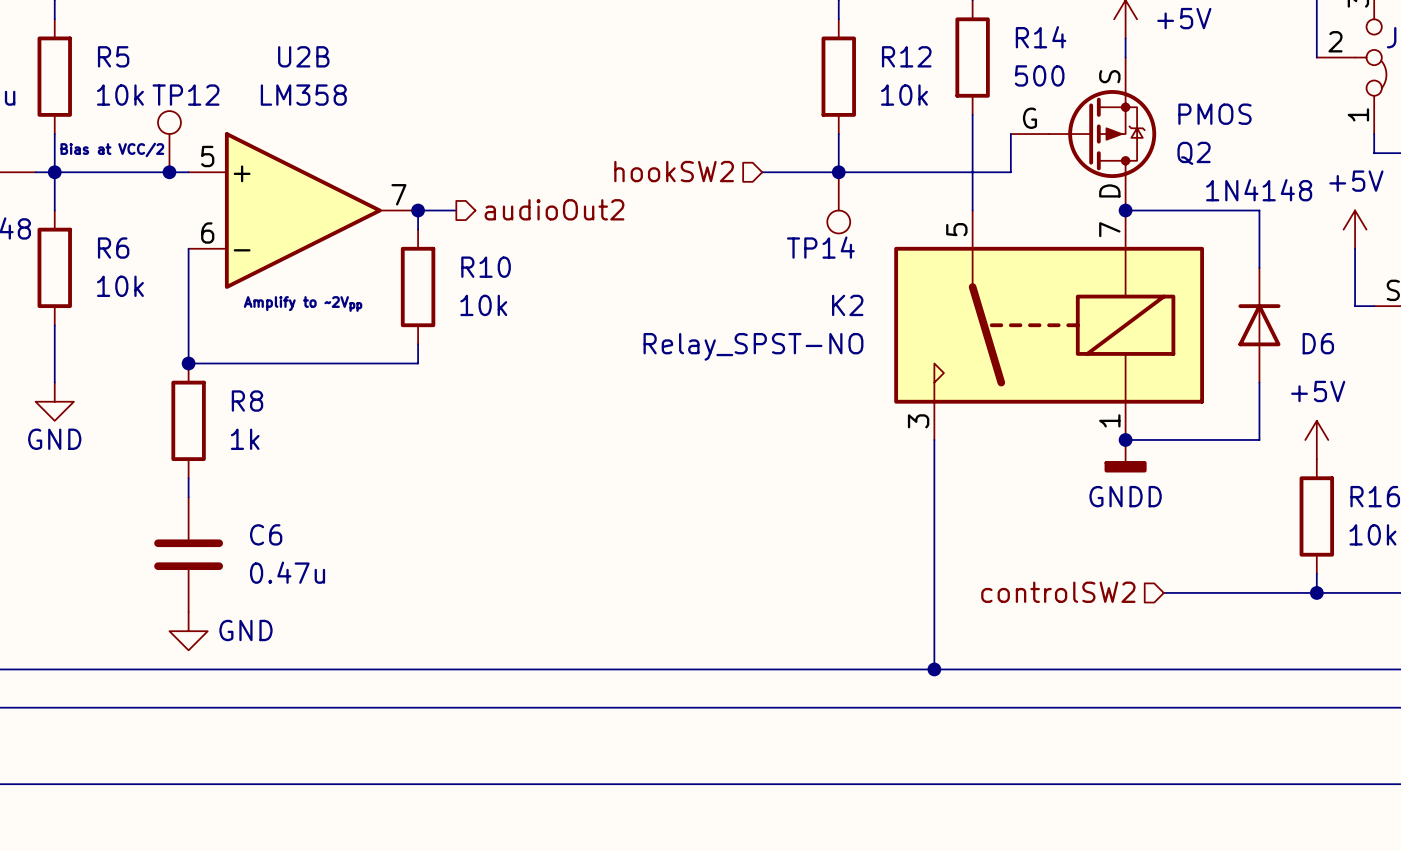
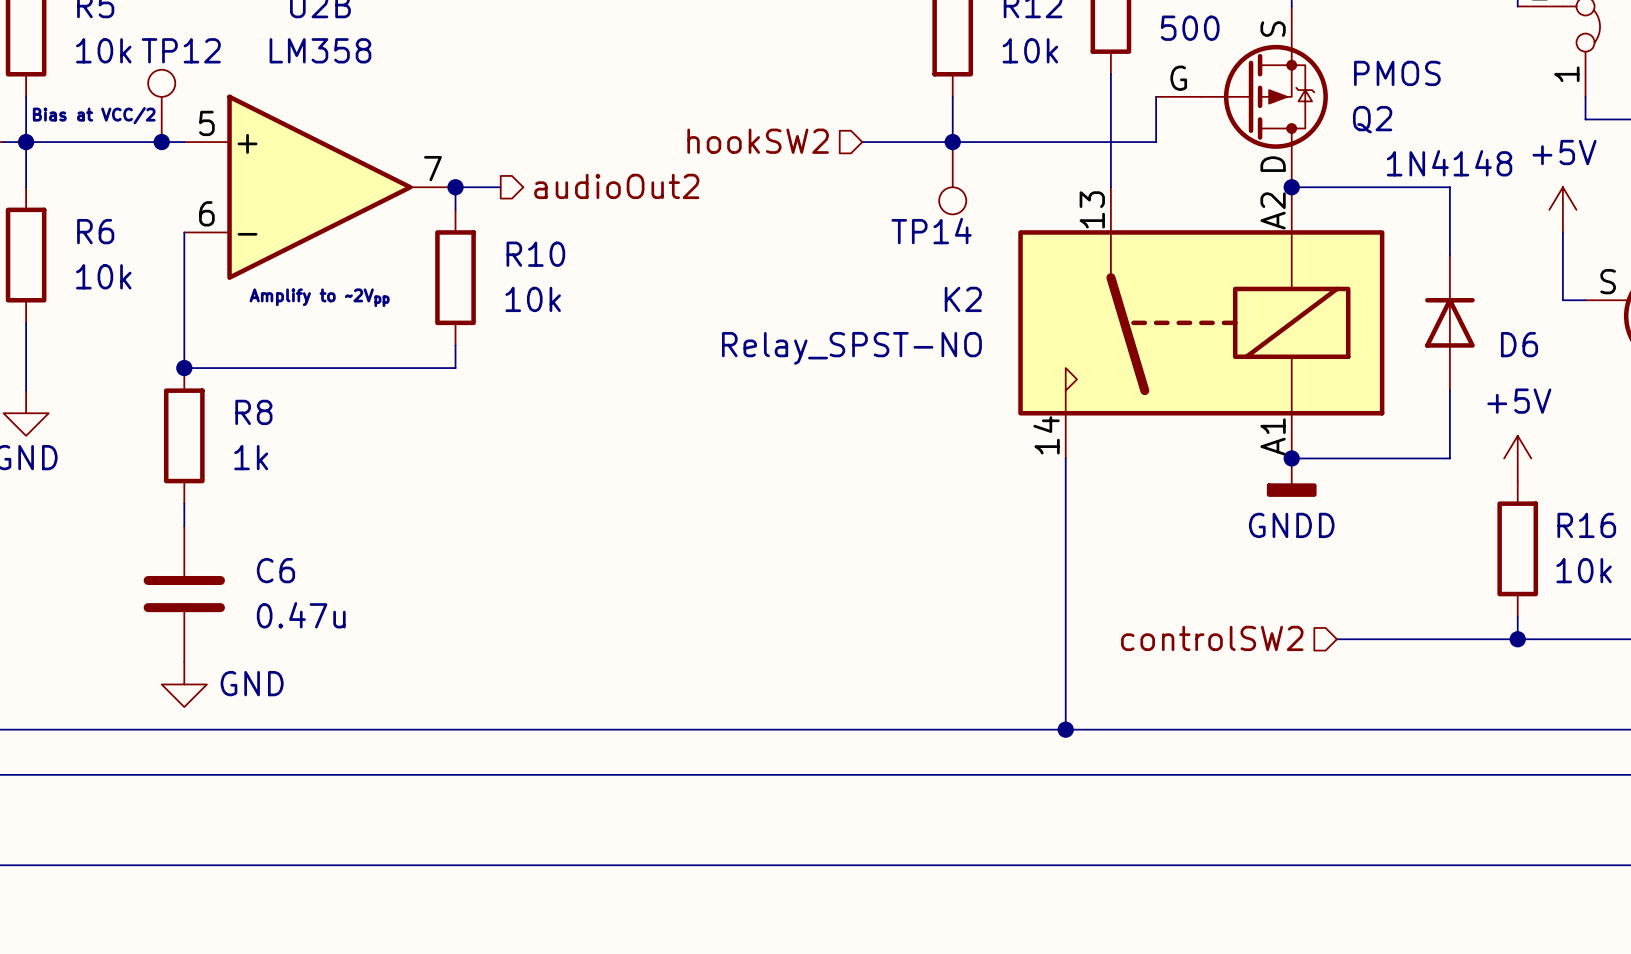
K2 pin number: 5 (956, 229) -> 13 (1092, 209)
K2 pin number: 7 (1109, 229) -> A2 (1273, 210)
K2 pin number: 1 (1109, 420) -> A1 (1273, 436)
K2 pin number: 3 (918, 421) -> 14 (1046, 435)

